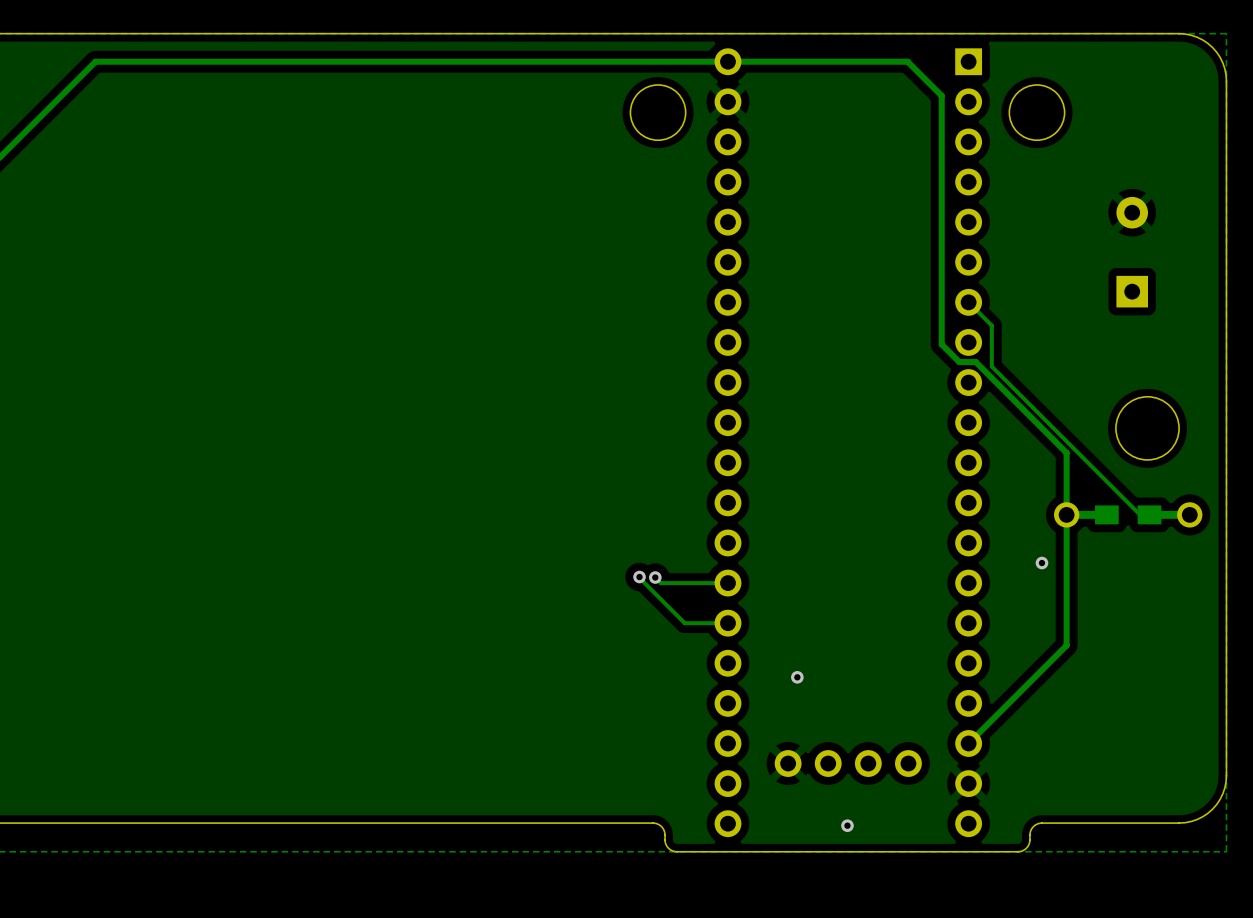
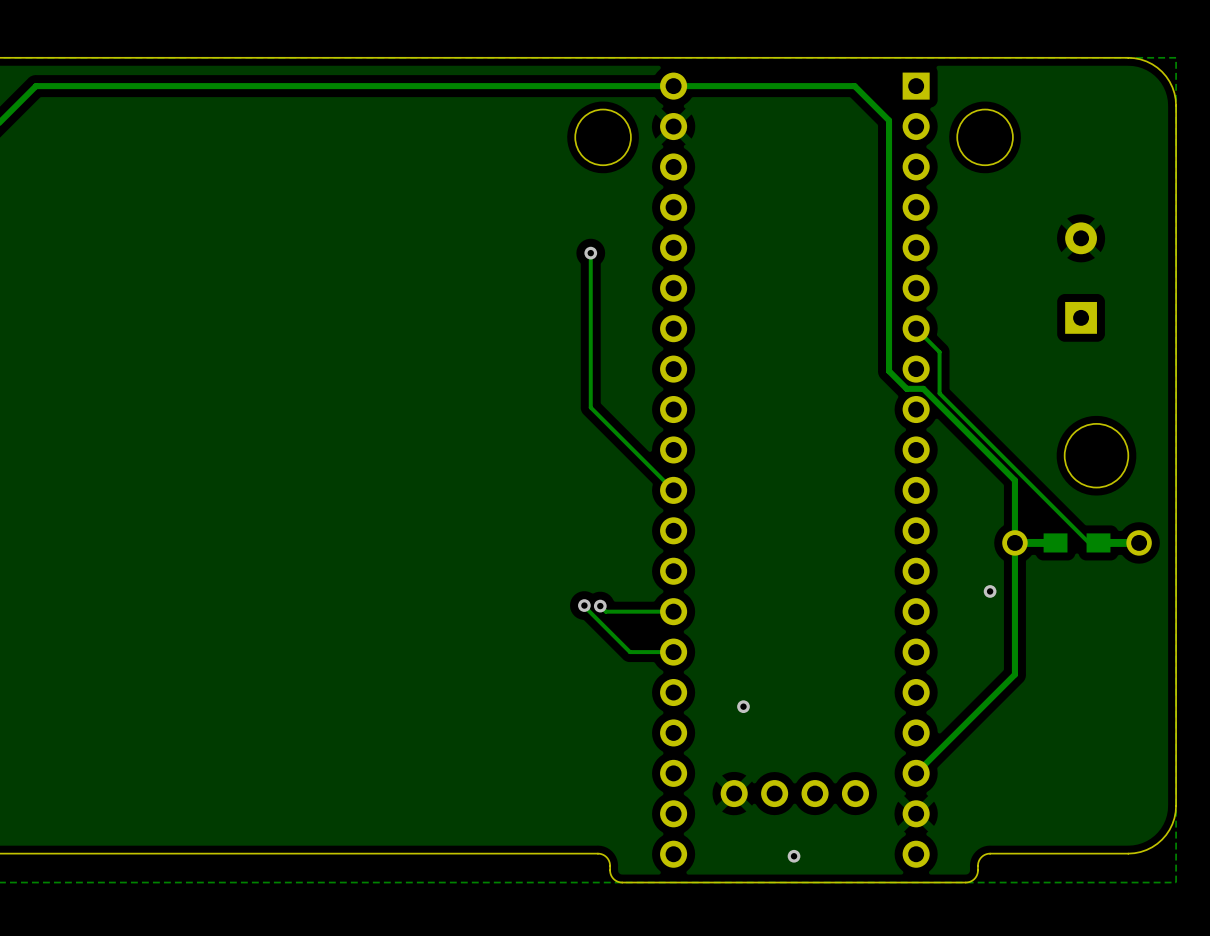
track: none -> (590, 253) (590, 407) (673, 490)
via: none -> (590, 253)

